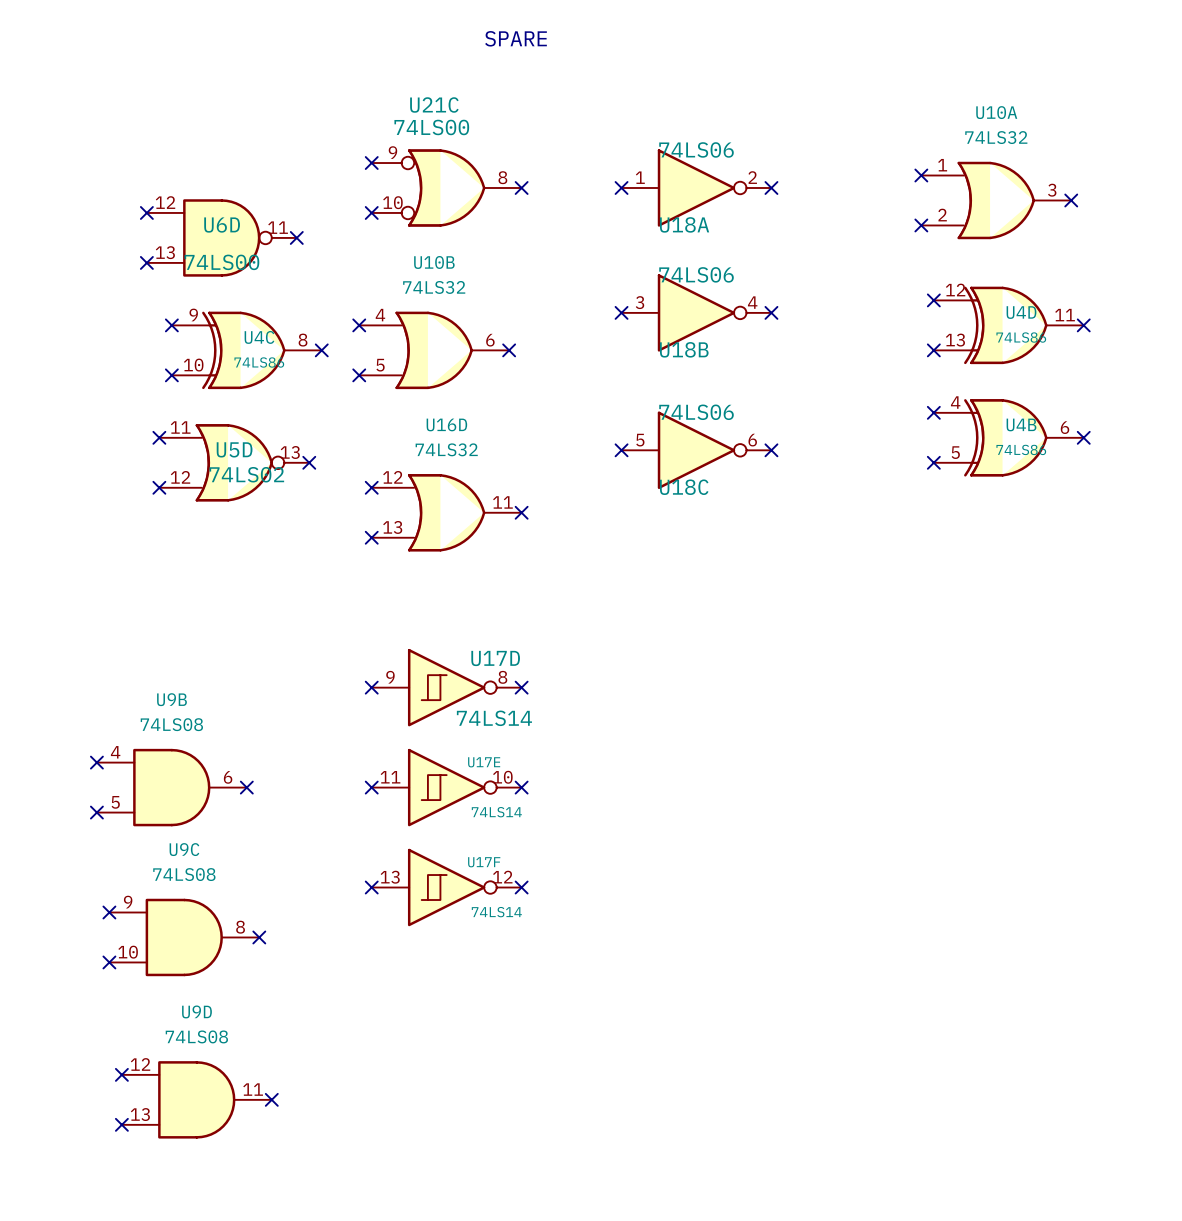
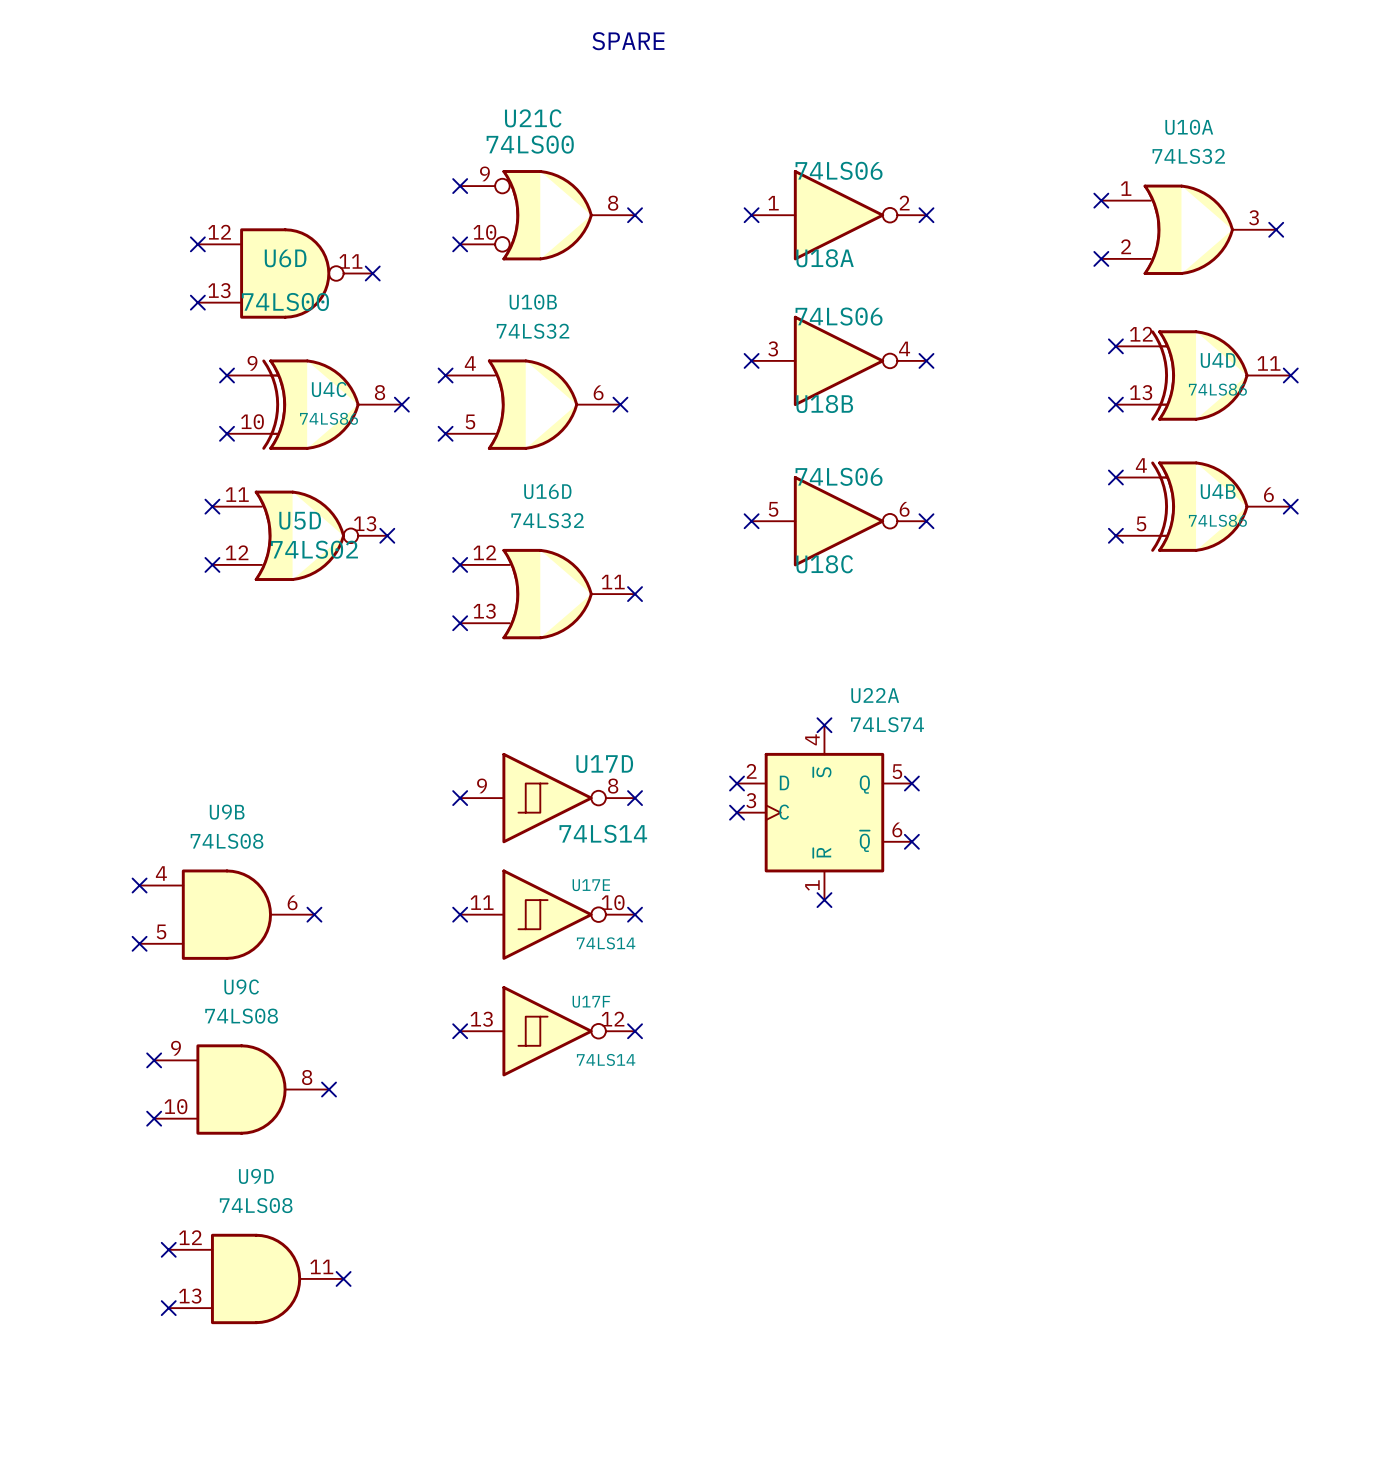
no-connect mark: none -> (824, 725)
no-connect mark: none -> (737, 783)
no-connect mark: none -> (911, 783)
no-connect mark: none -> (737, 812)
U22A: none -> 74LS74 (824, 812)
no-connect mark: none -> (911, 841)
no-connect mark: none -> (824, 900)

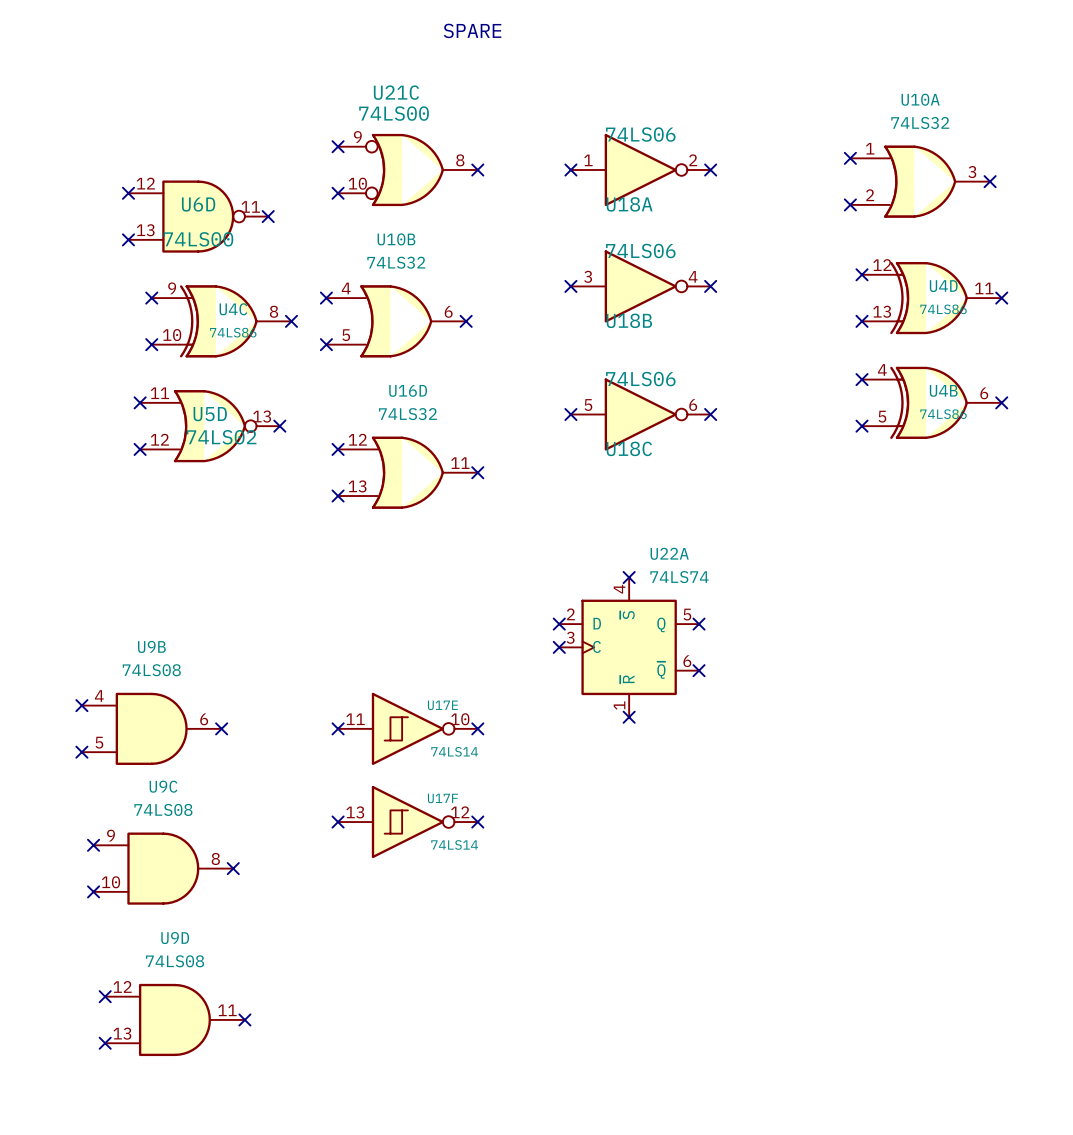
no-connect mark: (460, 798) -> none
U17D: 74LS14 (547, 798) -> none
no-connect mark: (635, 798) -> none

